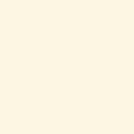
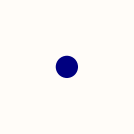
junction: none -> (66, 66)

